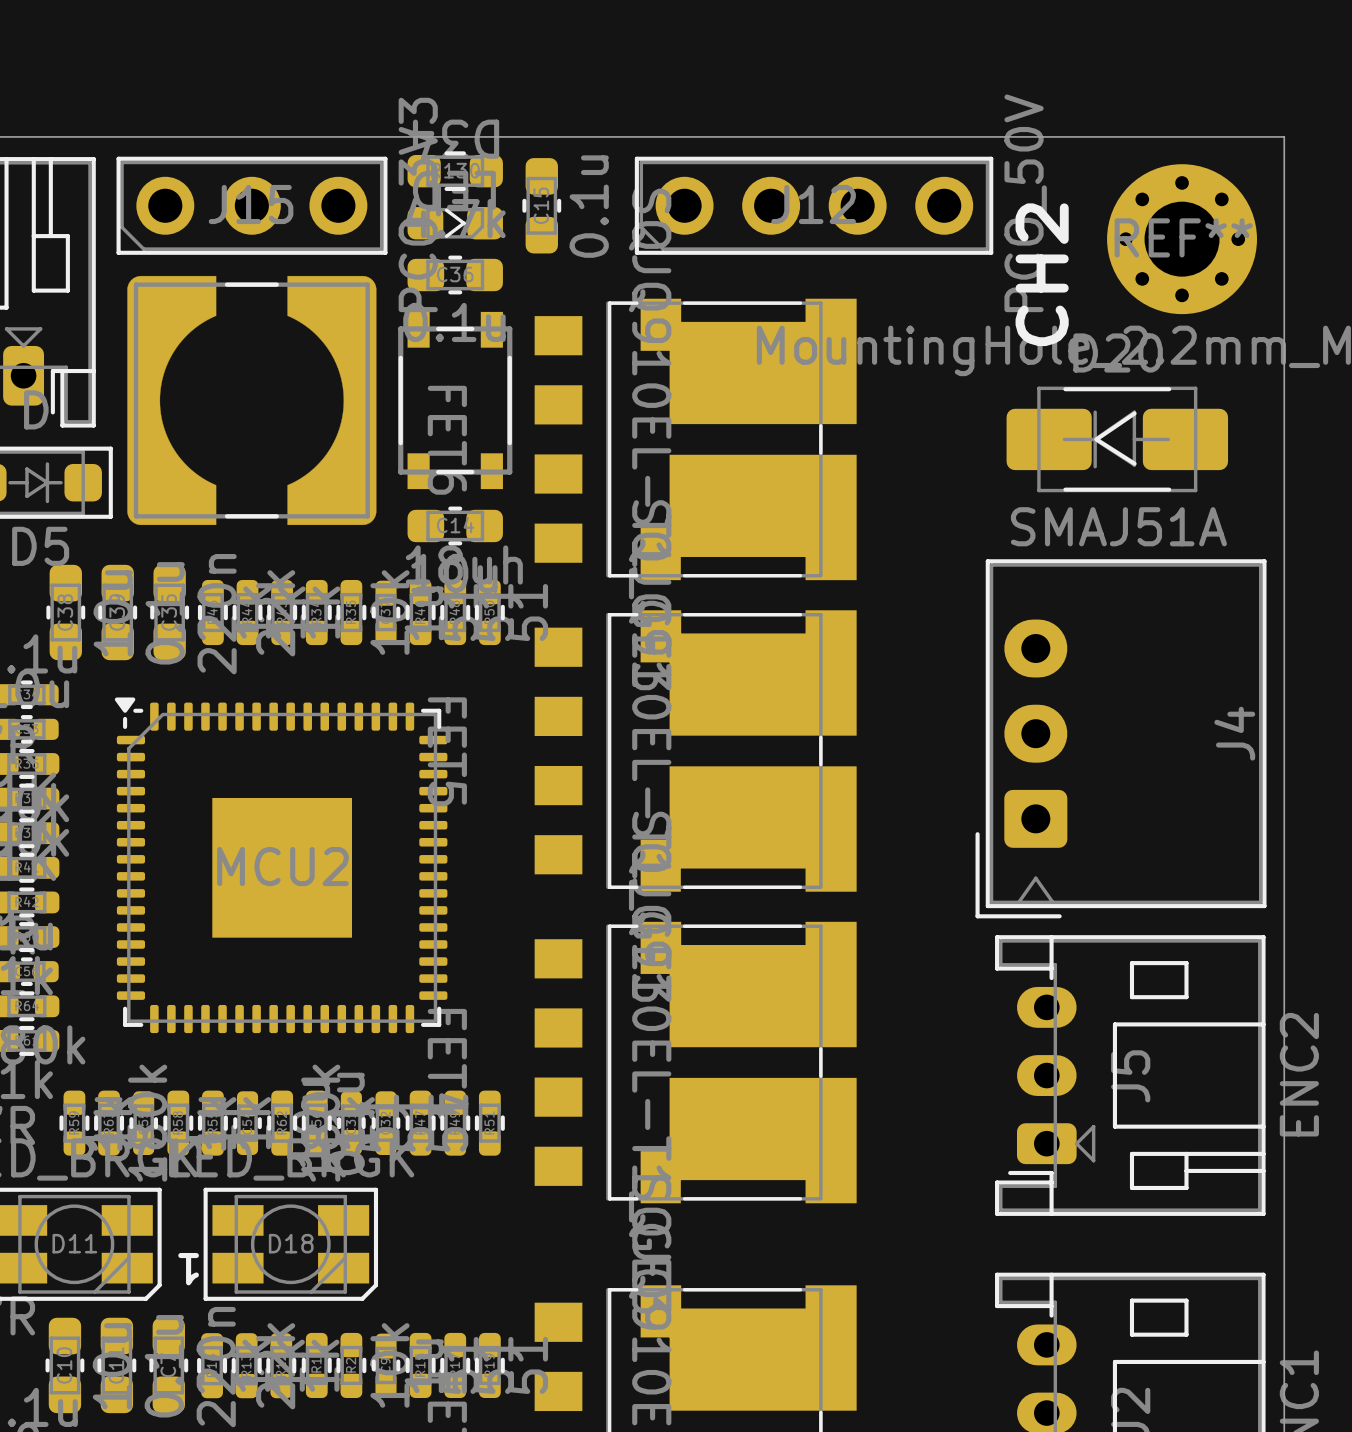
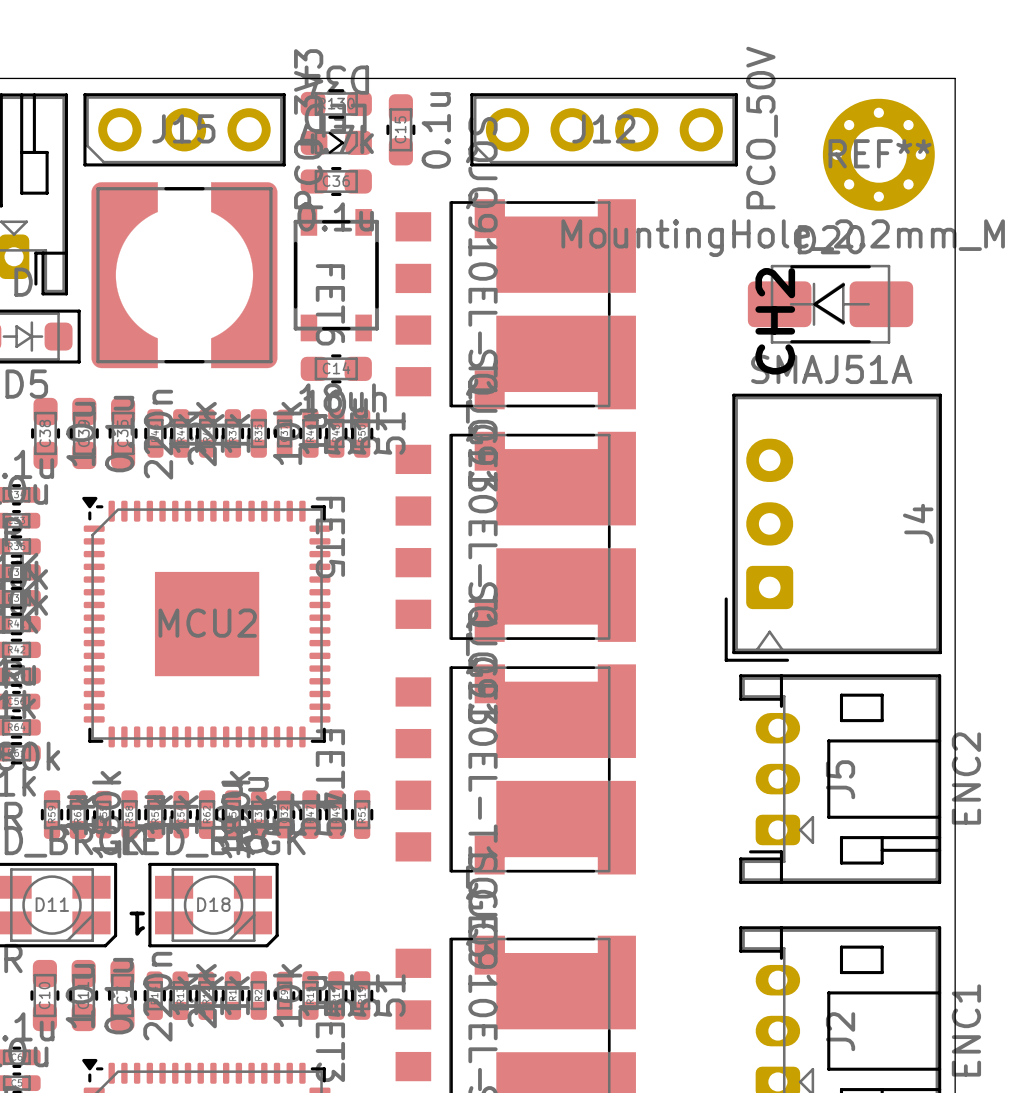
text position: CH2 (1042, 274) -> CH2 (775, 321)

